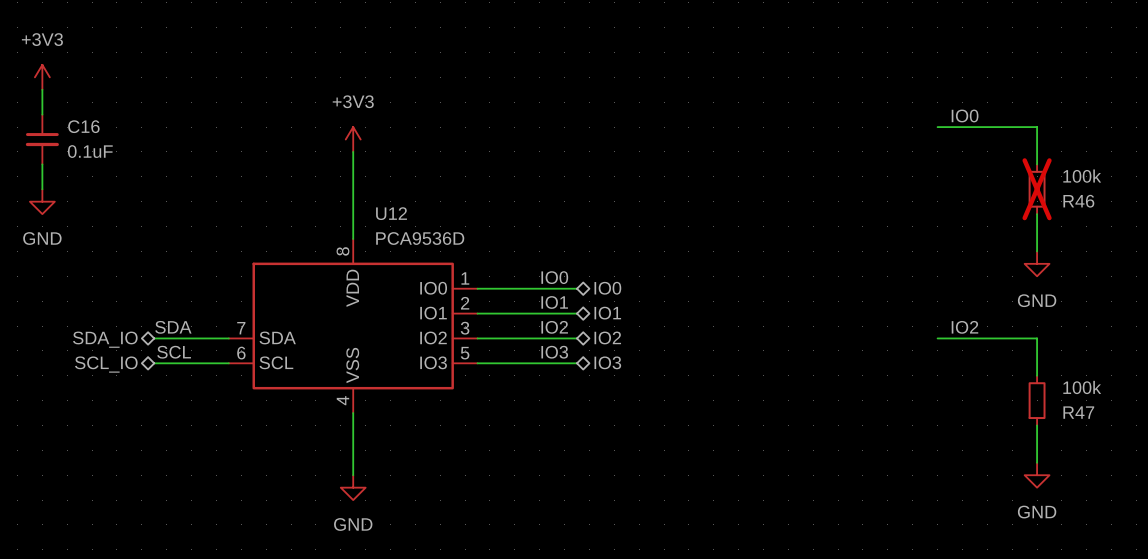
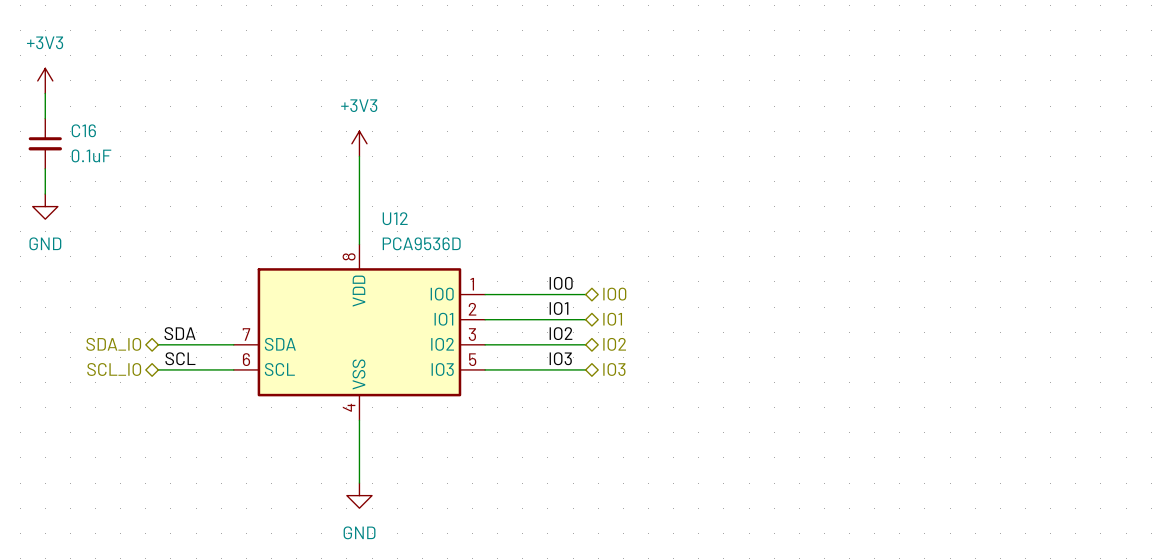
label: IO0 (965, 115) -> none
wire: (937, 127) (1037, 127) (1037, 164) -> none
R46: 100k (1037, 189) -> none
wire: (1037, 214) (1037, 251) -> none
power symbol: GND (1037, 263) -> none
label: IO2 (964, 327) -> none
wire: (937, 338) (1037, 338) (1037, 375) -> none
R47: 100k (1037, 400) -> none
wire: (1037, 425) (1037, 462) -> none
power symbol: GND (1037, 475) -> none

